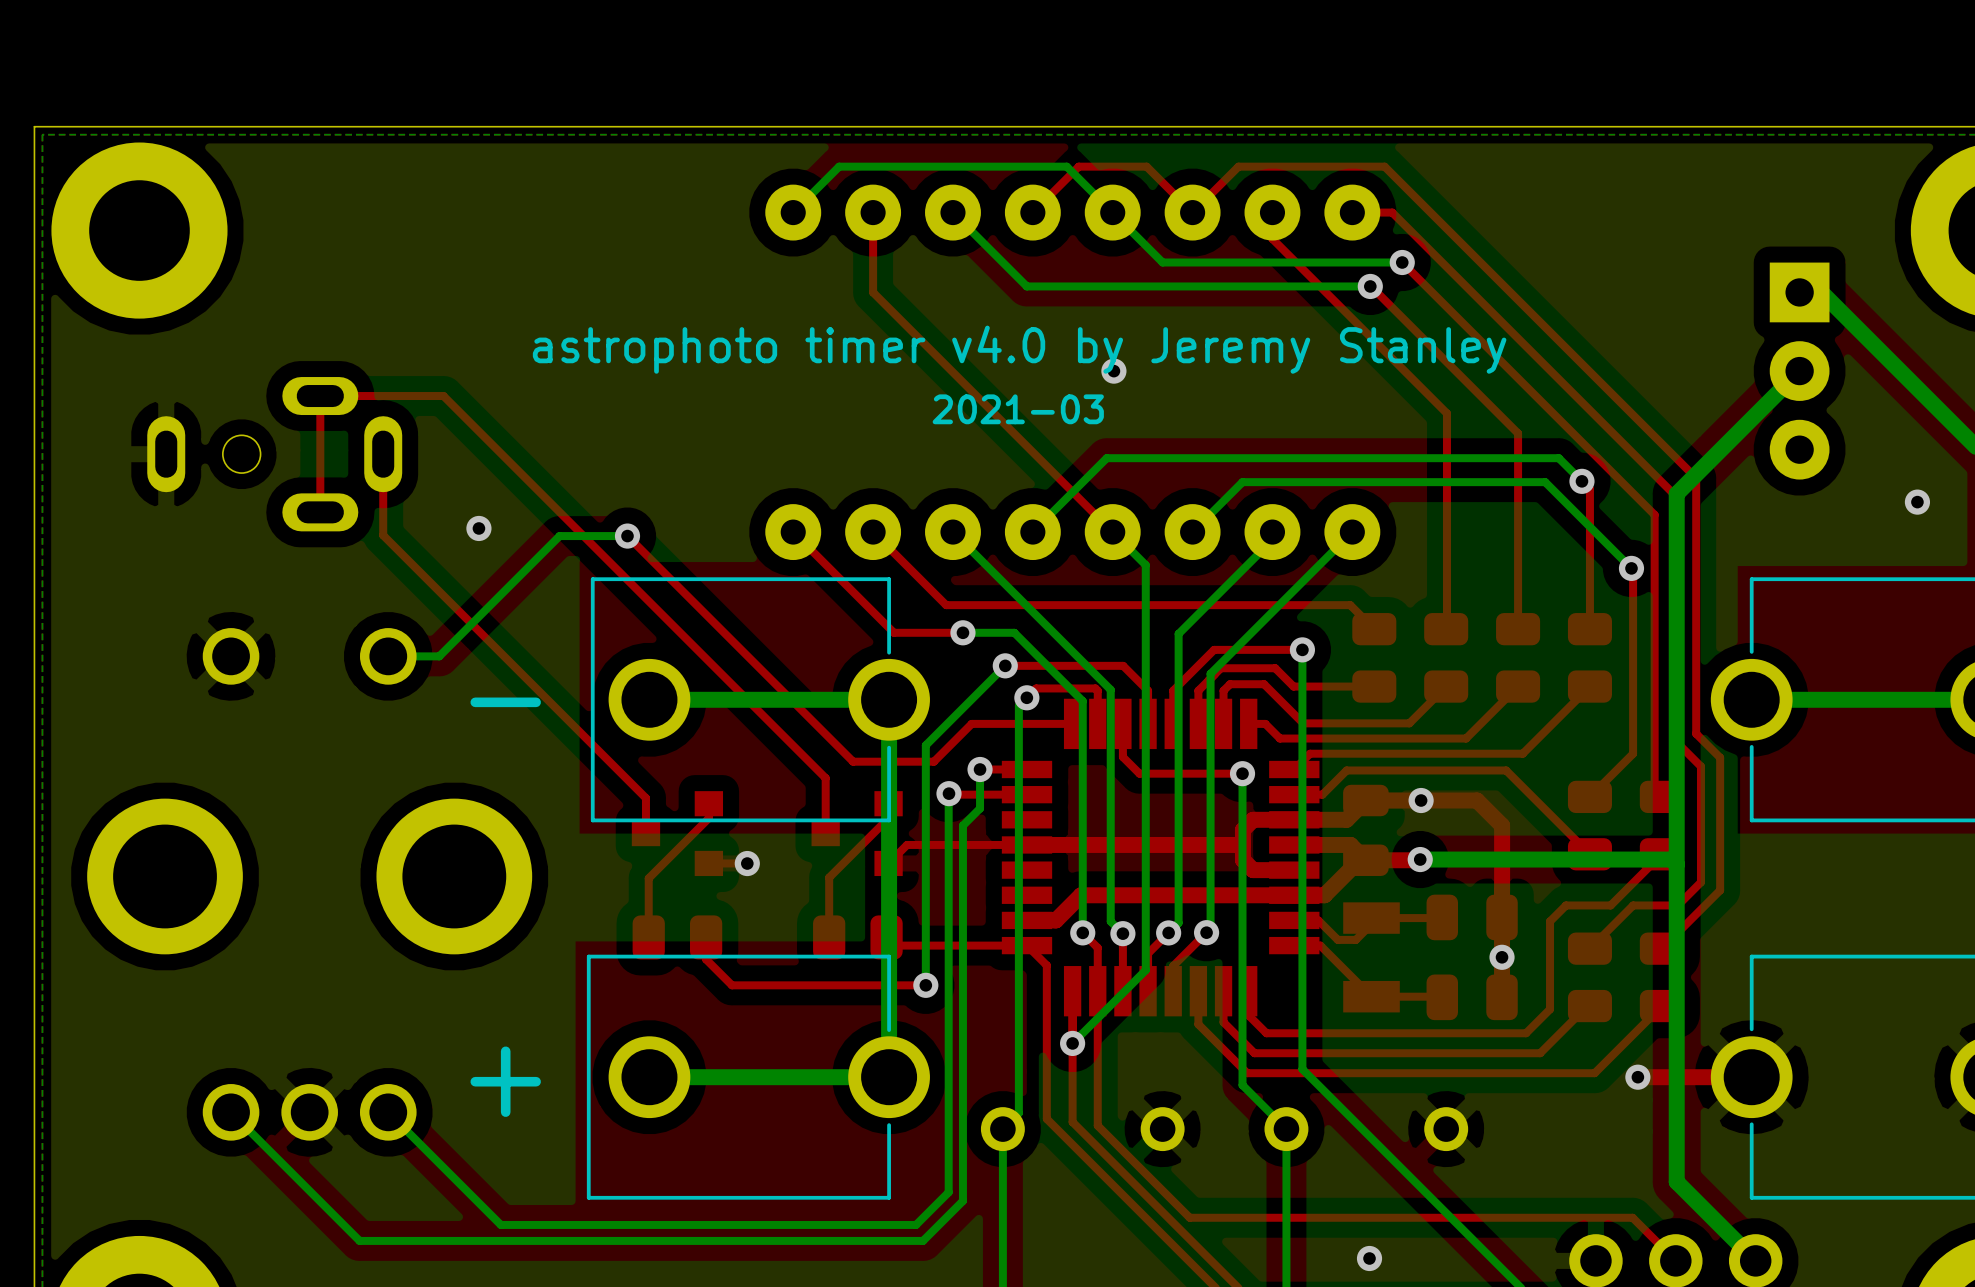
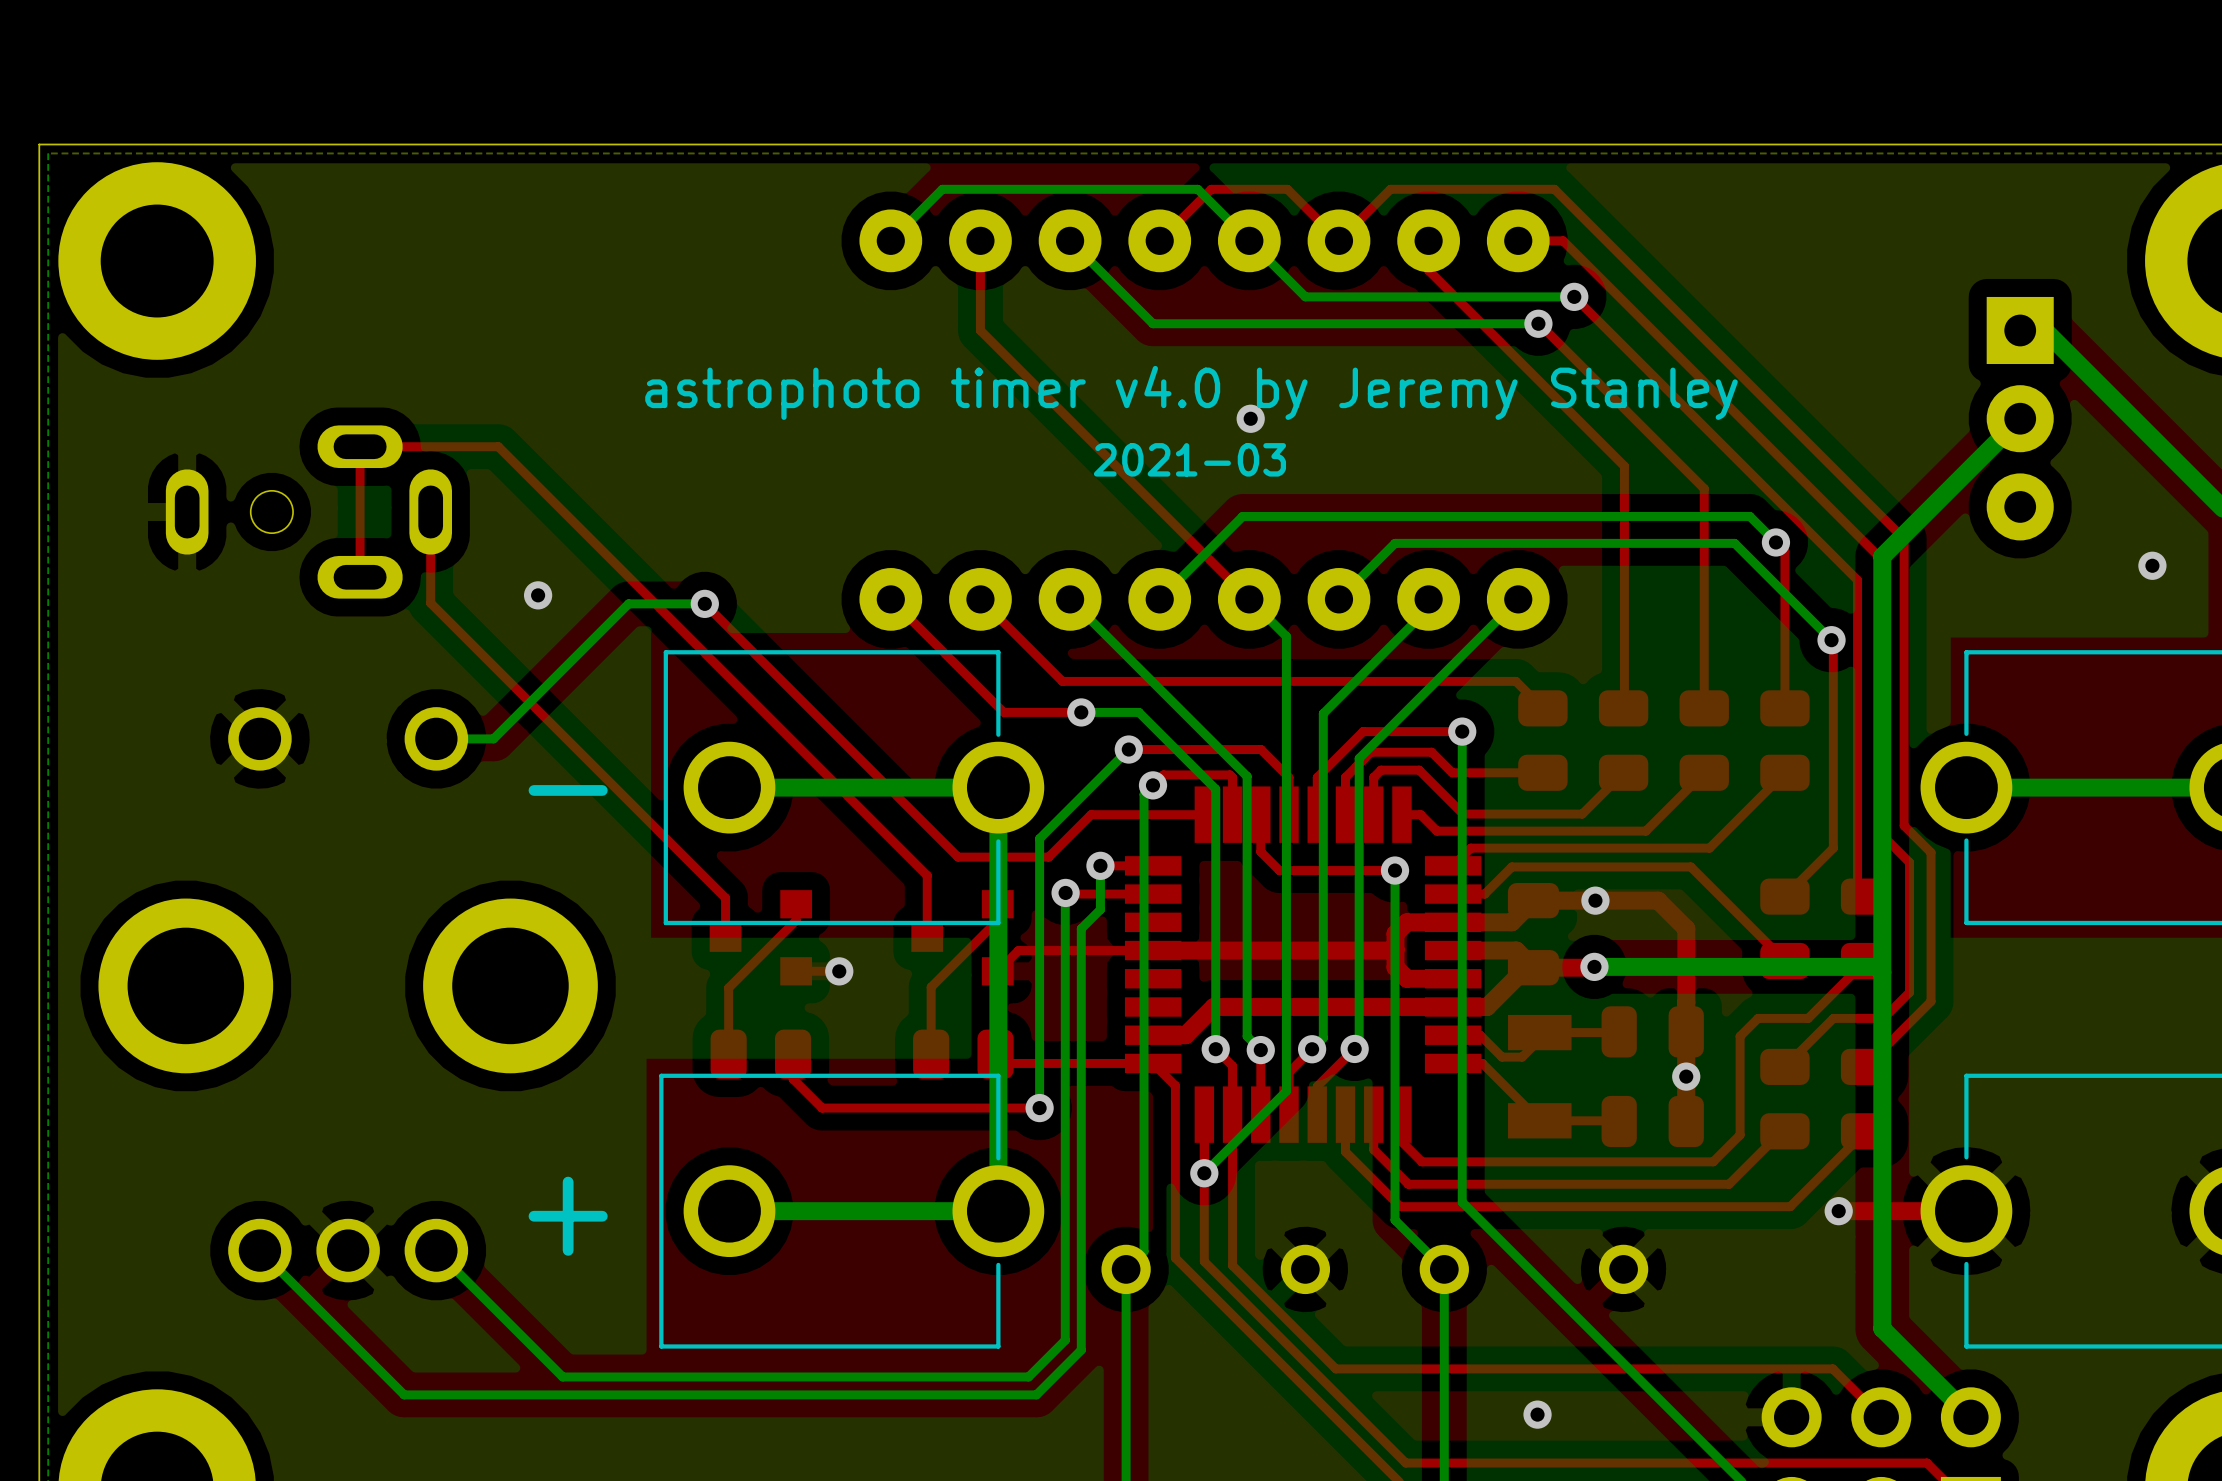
text position: astrophoto timer v4.0 by Jeremy Stanley (1019, 349) -> astrophoto timer v4.0 by Jeremy Stanley (1191, 392)
text position: 2021-03 (1018, 409) -> 2021-03 (1189, 459)

